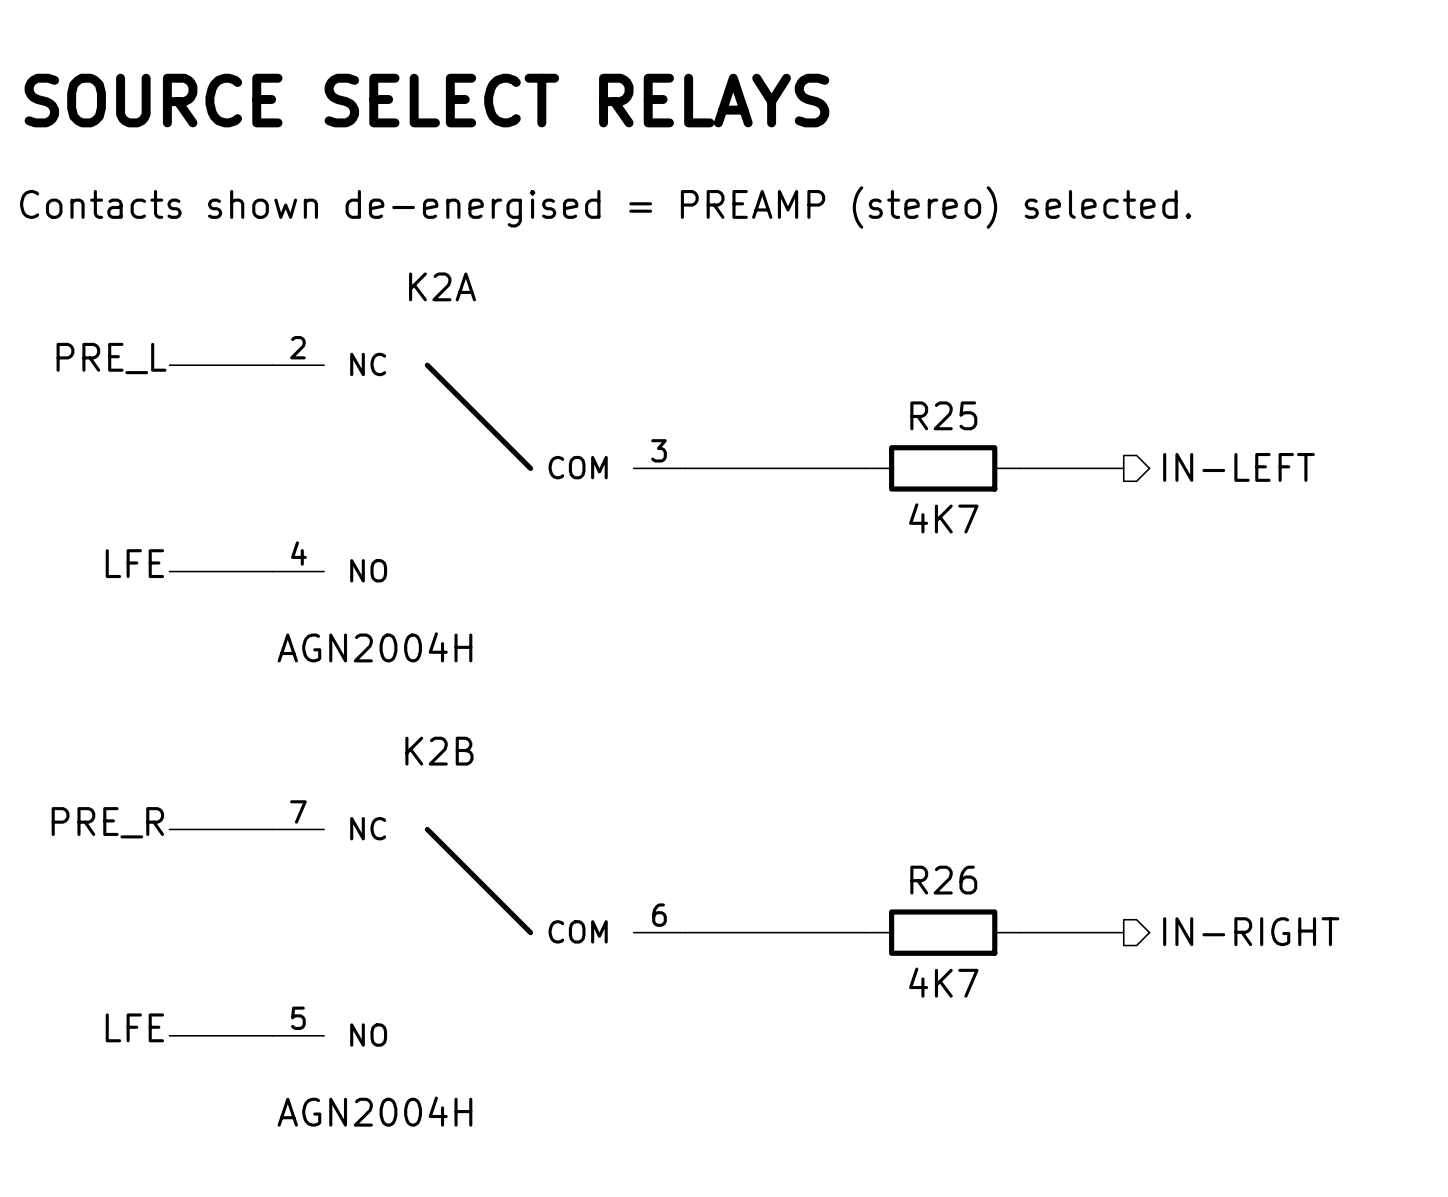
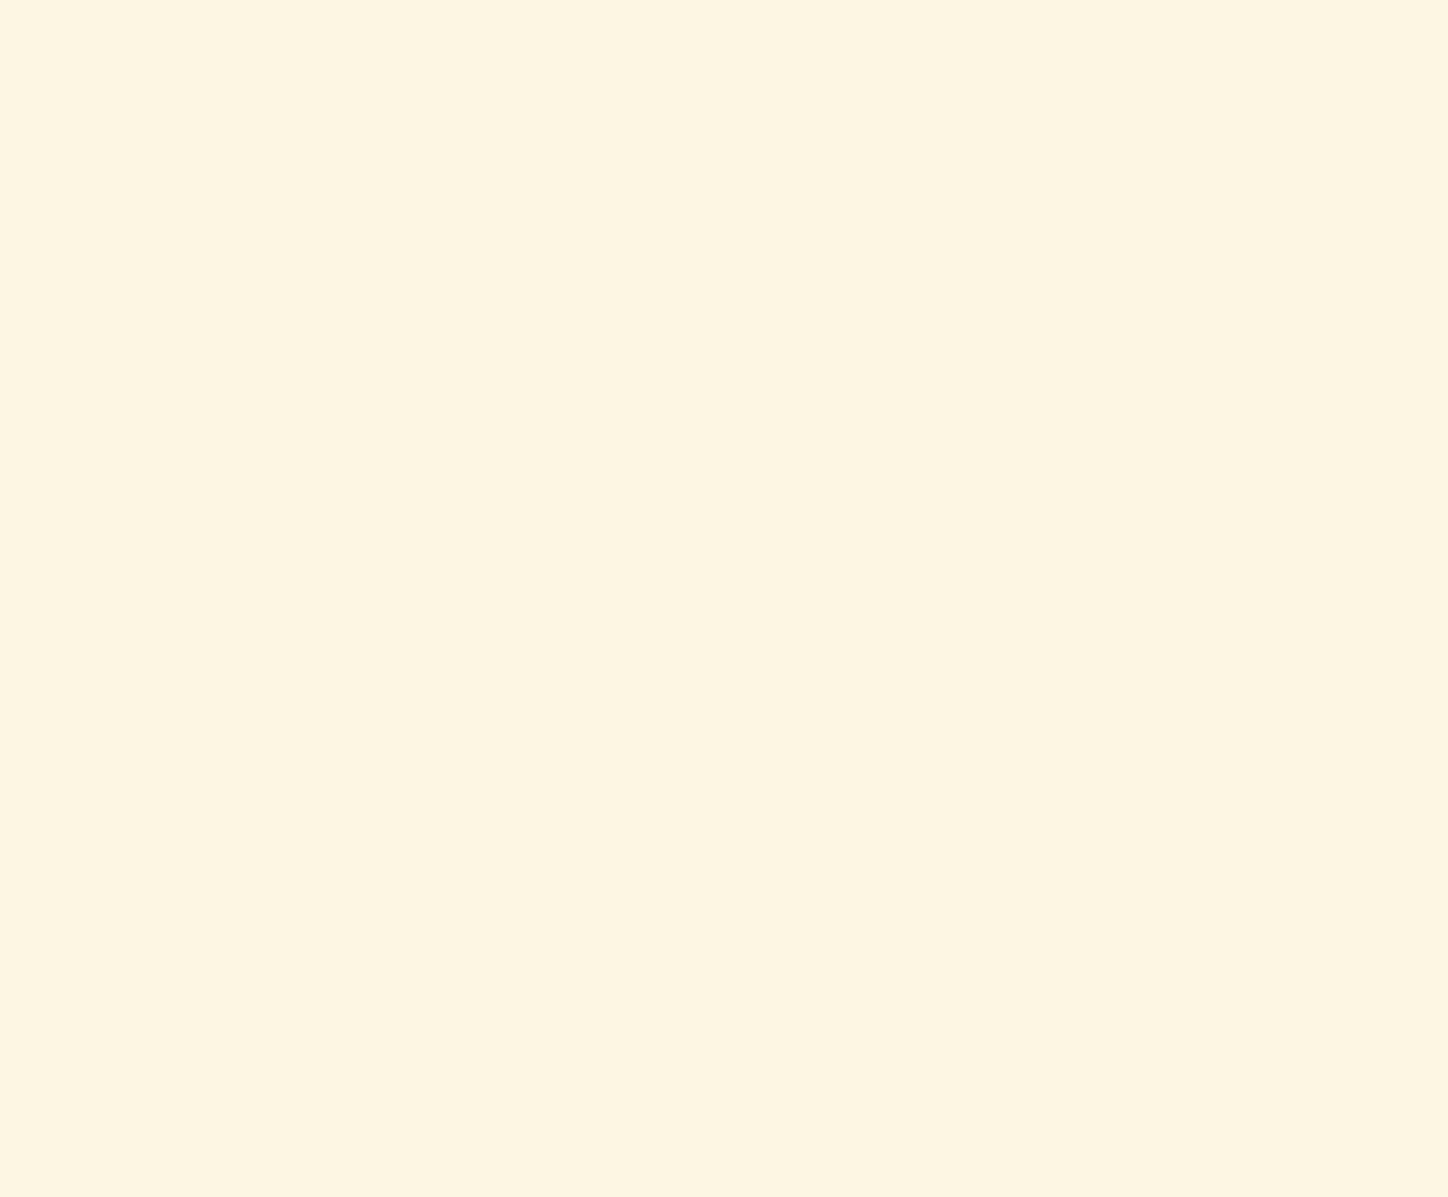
text: SOURCE SELECT RELAYS (426, 100) -> none
text: Contacts shown de-energised = PREAMP (stereo) selected. (605, 207) -> none
label: PRE_L (111, 358) -> none
wire: (169, 365) (272, 365) -> none
K2A: AGN2004H (478, 467) -> none
hierarchical label: IN-LEFT (1238, 467) -> none
wire: (685, 468) (865, 468) -> none
R25: 4K7 (943, 468) -> none
wire: (1020, 468) (1123, 468) -> none
label: LFE (134, 563) -> none
wire: (169, 571) (272, 571) -> none
label: PRE_R (107, 822) -> none
wire: (169, 829) (272, 829) -> none
K2B: AGN2004H (478, 931) -> none
hierarchical label: IN-RIGHT (1251, 931) -> none
wire: (685, 932) (865, 932) -> none
R26: 4K7 (943, 932) -> none
wire: (1020, 932) (1123, 932) -> none
label: LFE (134, 1027) -> none
wire: (169, 1035) (272, 1035) -> none

